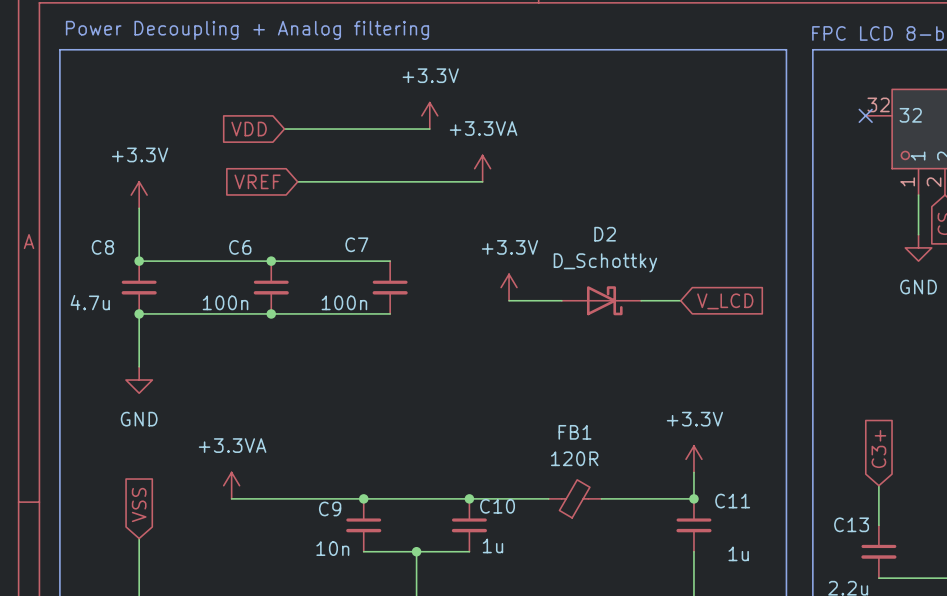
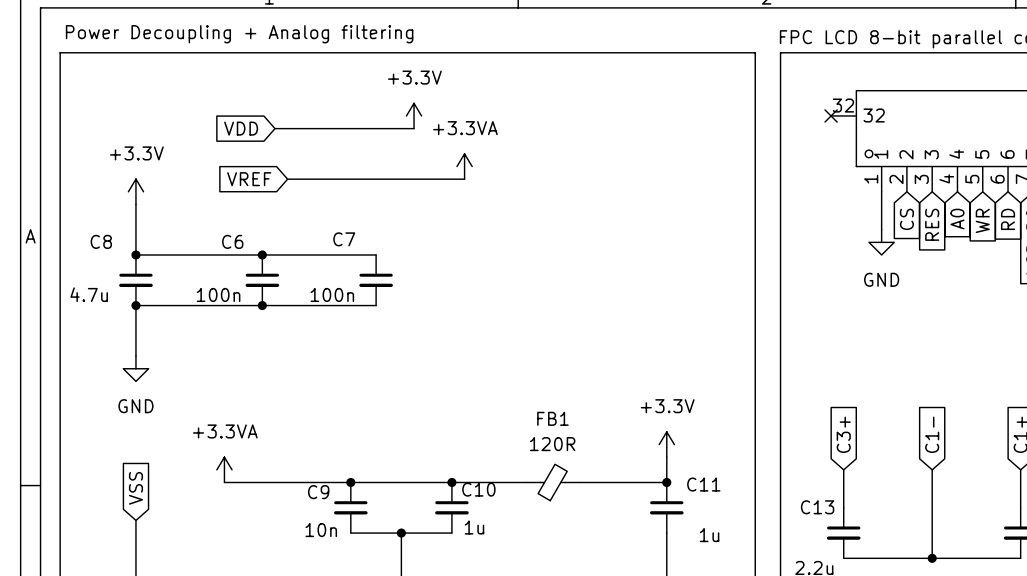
power symbol: +3.3V (509, 287) -> none
wire: (509, 300) (561, 300) -> none
D2: D_Schottky (601, 300) -> none
wire: (641, 300) (680, 300) -> none
global label: V_LCD (725, 301) -> none

